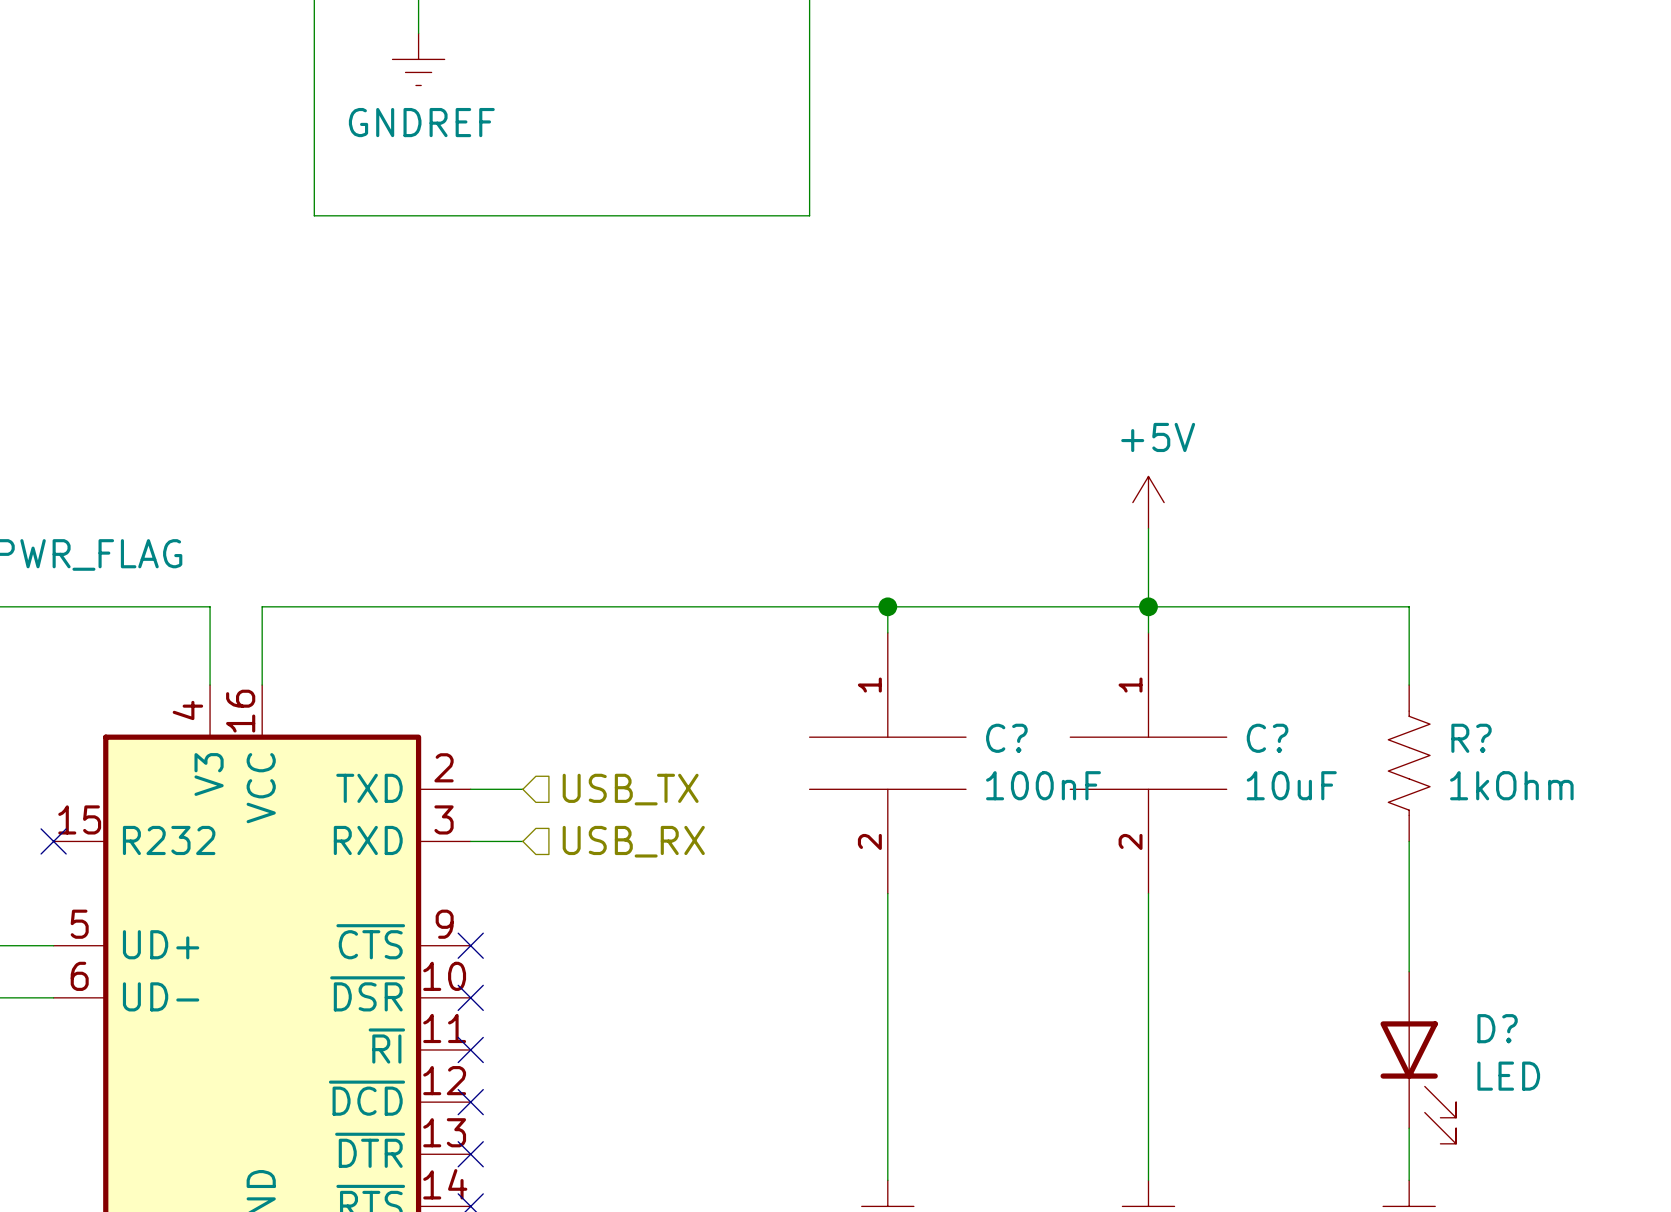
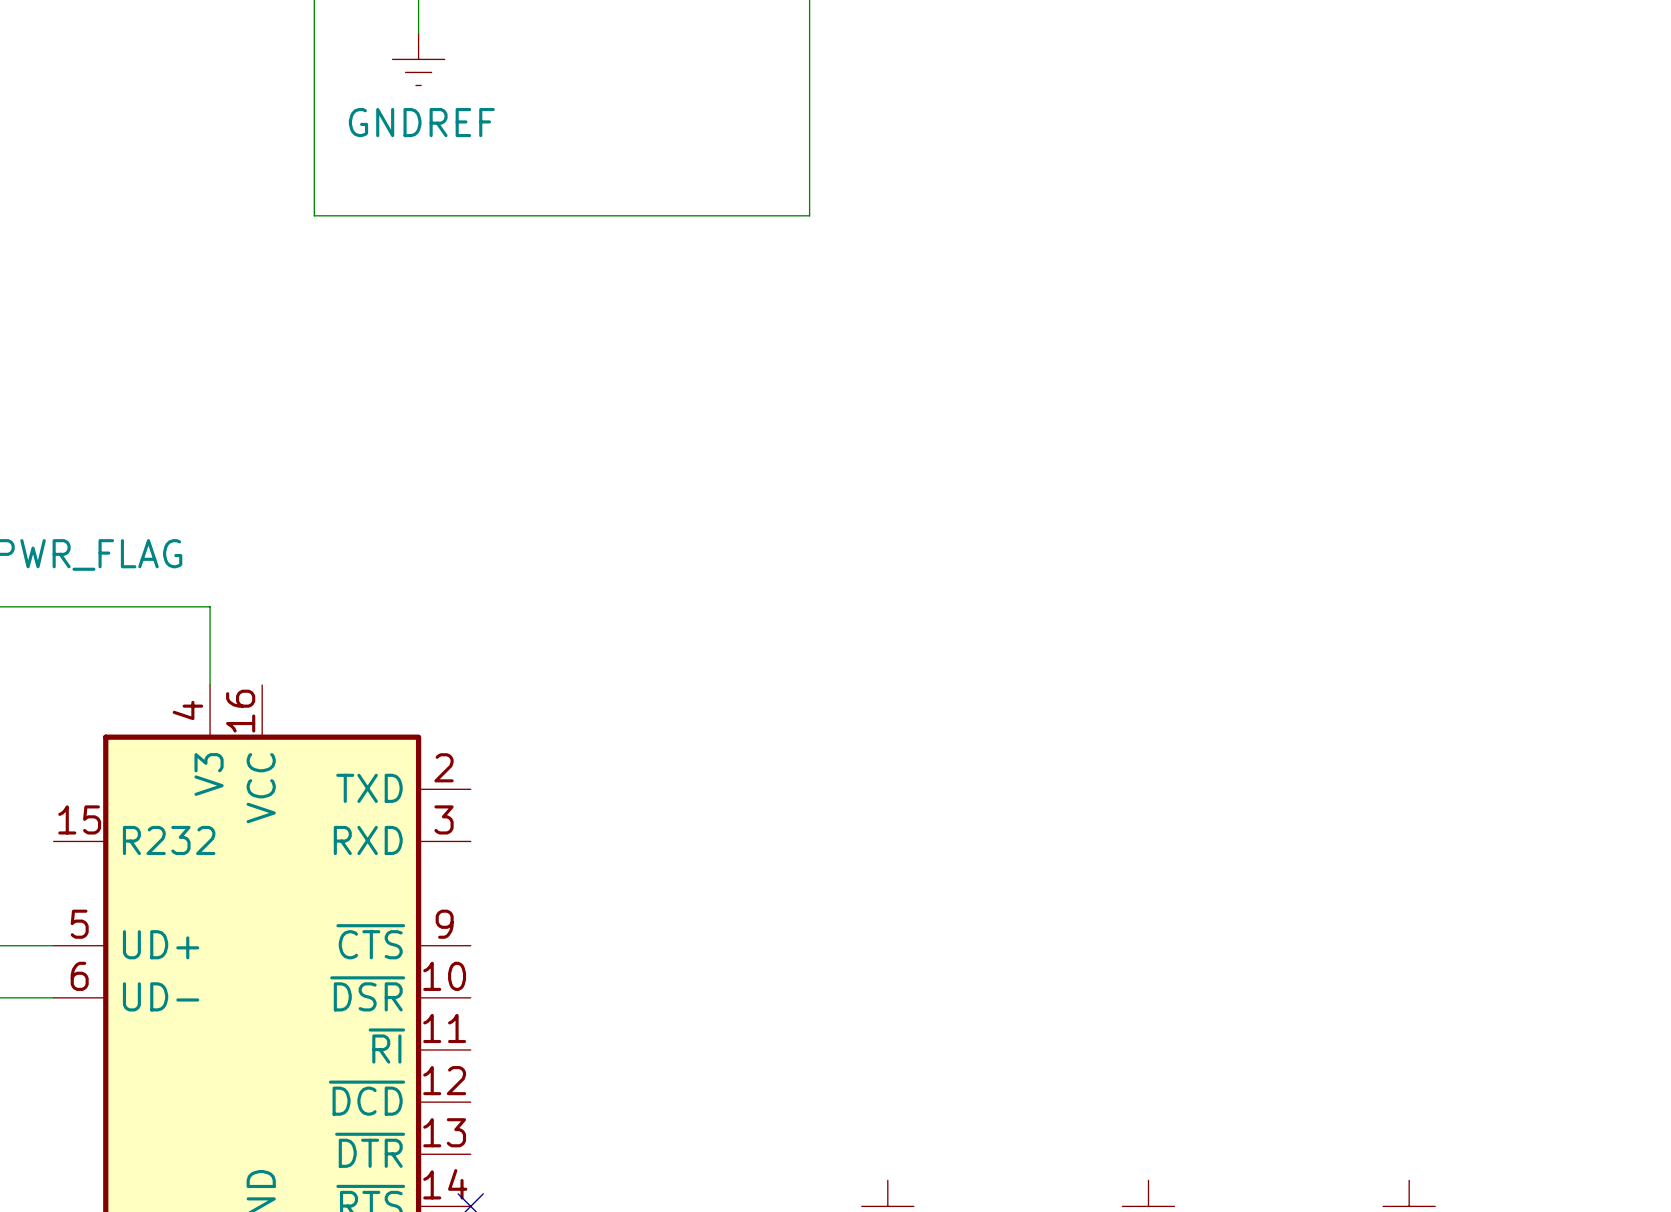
power symbol: +5V (1148, 502) -> none
wire: (1148, 528) (1148, 632) -> none
wire: (887, 606) (887, 632) -> none
junction: (887, 606) -> none
junction: (1148, 606) -> none
wire: (262, 685) (262, 606) (1409, 606) (1409, 685) -> none
C?: 100nF (887, 763) -> none
C?: 10uF (1148, 763) -> none
R?: 1kOhm (1409, 763) -> none
wire: (470, 789) (522, 789) -> none
hierarchical label: USB_TX (630, 789) -> none
no-connect mark: (53, 841) -> none
wire: (470, 841) (522, 841) -> none
hierarchical label: USB_RX (633, 841) -> none
wire: (1409, 841) (1409, 971) -> none
wire: (887, 893) (887, 1180) -> none
wire: (1148, 893) (1148, 1180) -> none
no-connect mark: (470, 945) -> none
no-connect mark: (470, 997) -> none
no-connect mark: (470, 1049) -> none
D?: LED (1418, 1057) -> none
no-connect mark: (470, 1102) -> none
wire: (1409, 1128) (1409, 1180) -> none
no-connect mark: (470, 1154) -> none

